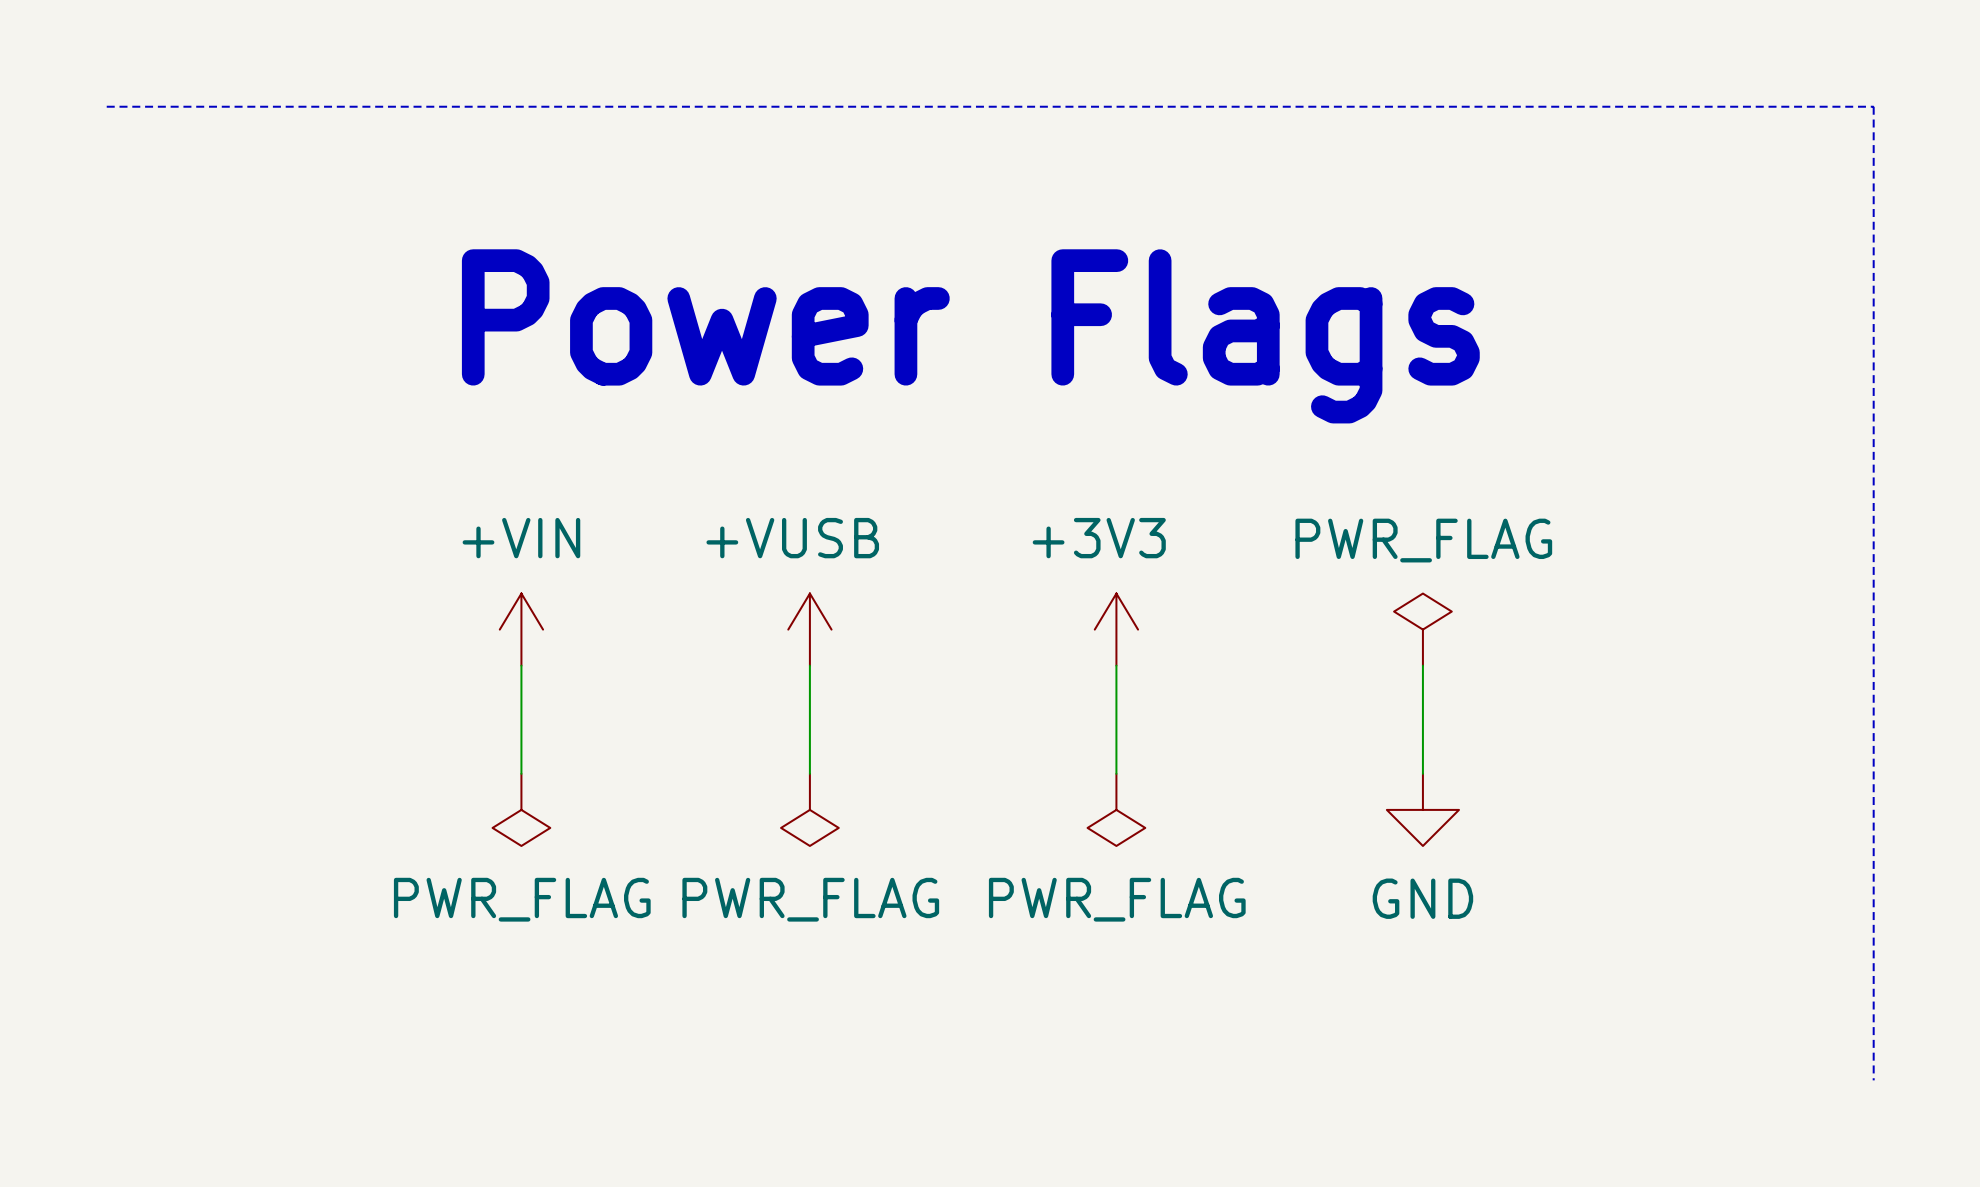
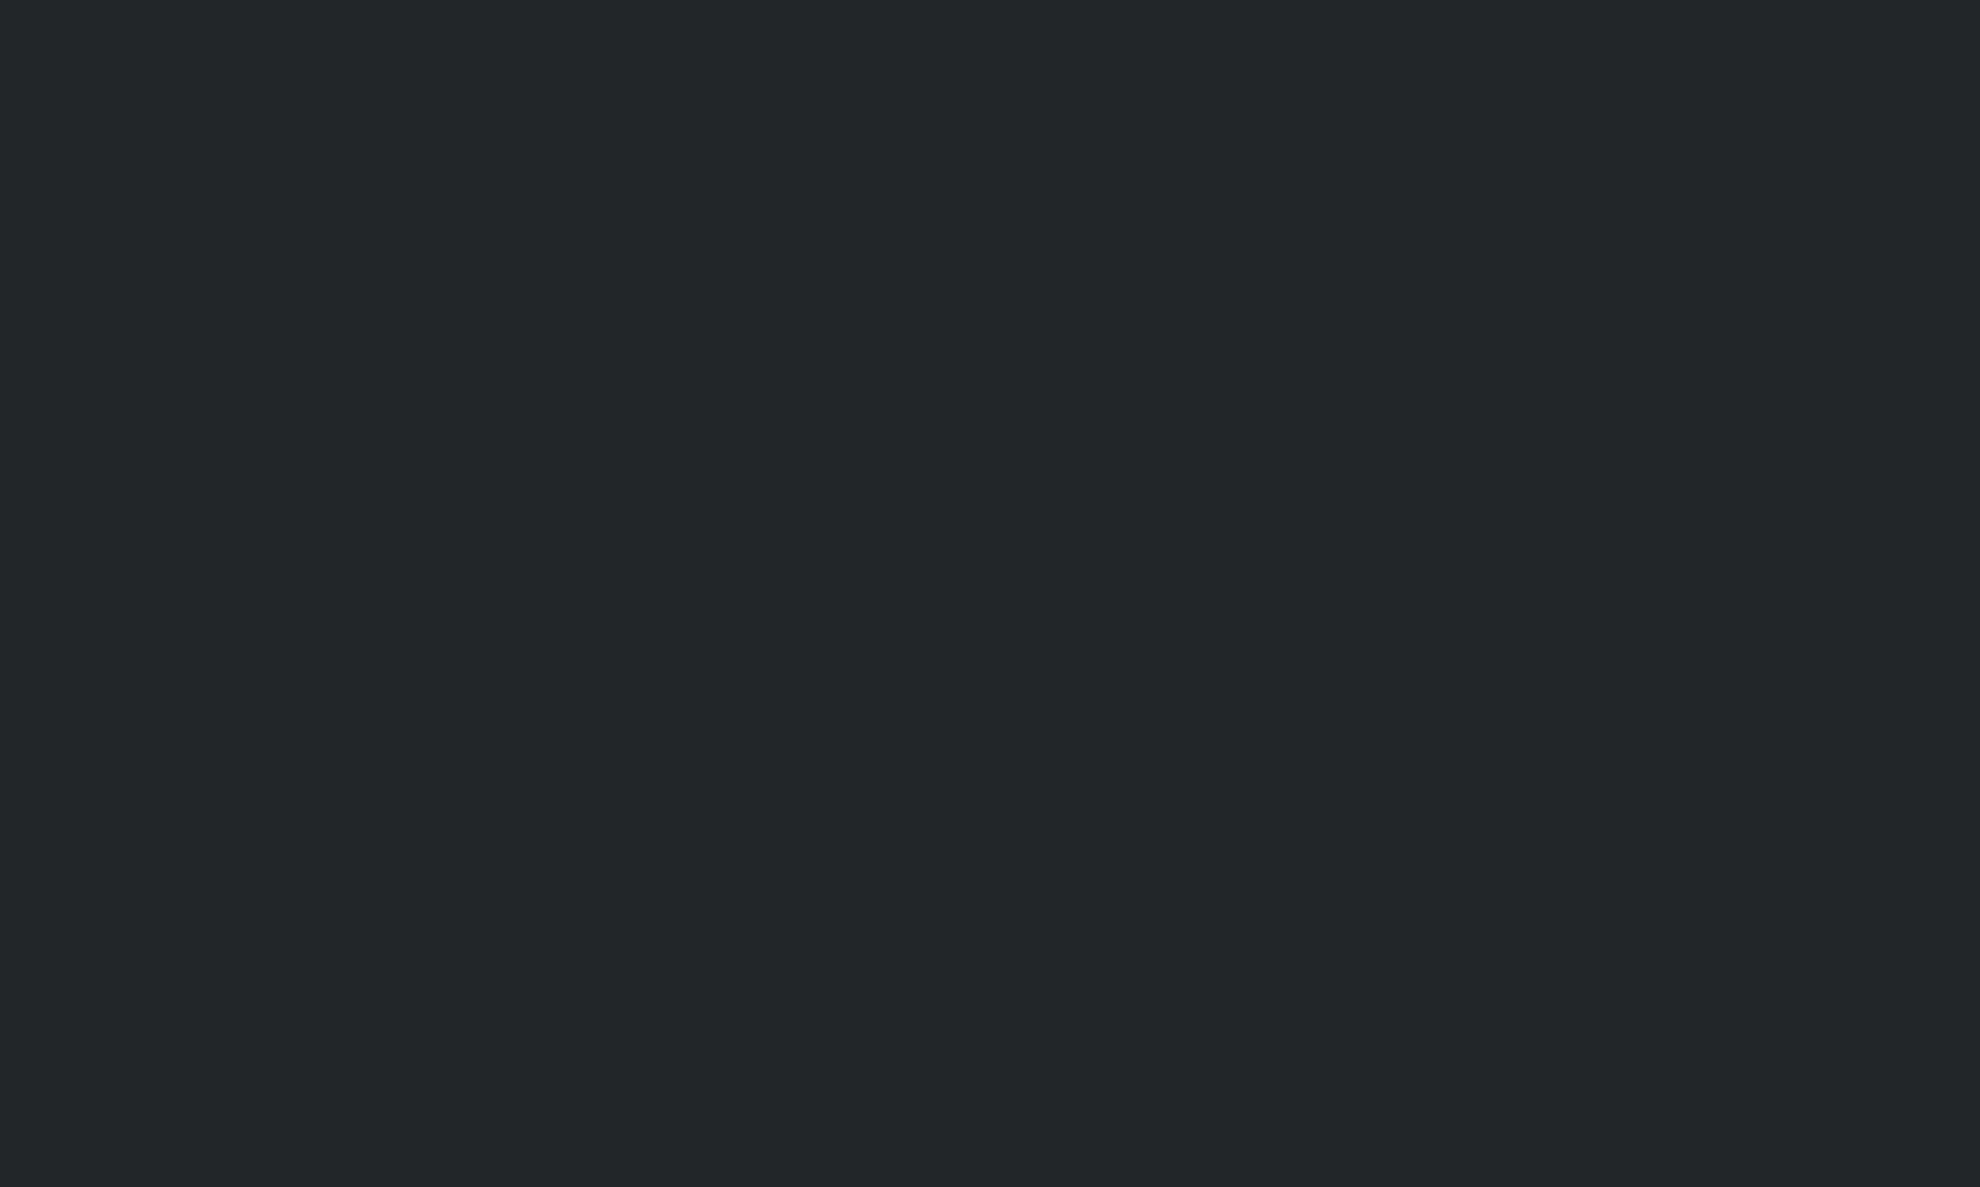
line: (106, 106) (1873, 106) (1873, 1080) -> none
text: Power Flags (970, 336) -> none
power symbol: +VIN (521, 629) -> none
power symbol: +VUSB (809, 629) -> none
power symbol: +3V3 (1116, 629) -> none
power symbol: PWR_FLAG (1422, 629) -> none
wire: (521, 665) (521, 773) -> none
wire: (809, 665) (809, 773) -> none
wire: (1116, 665) (1116, 773) -> none
wire: (1422, 665) (1422, 773) -> none
power symbol: PWR_FLAG (521, 809) -> none
power symbol: PWR_FLAG (809, 809) -> none
power symbol: PWR_FLAG (1116, 809) -> none
power symbol: GND (1422, 809) -> none

